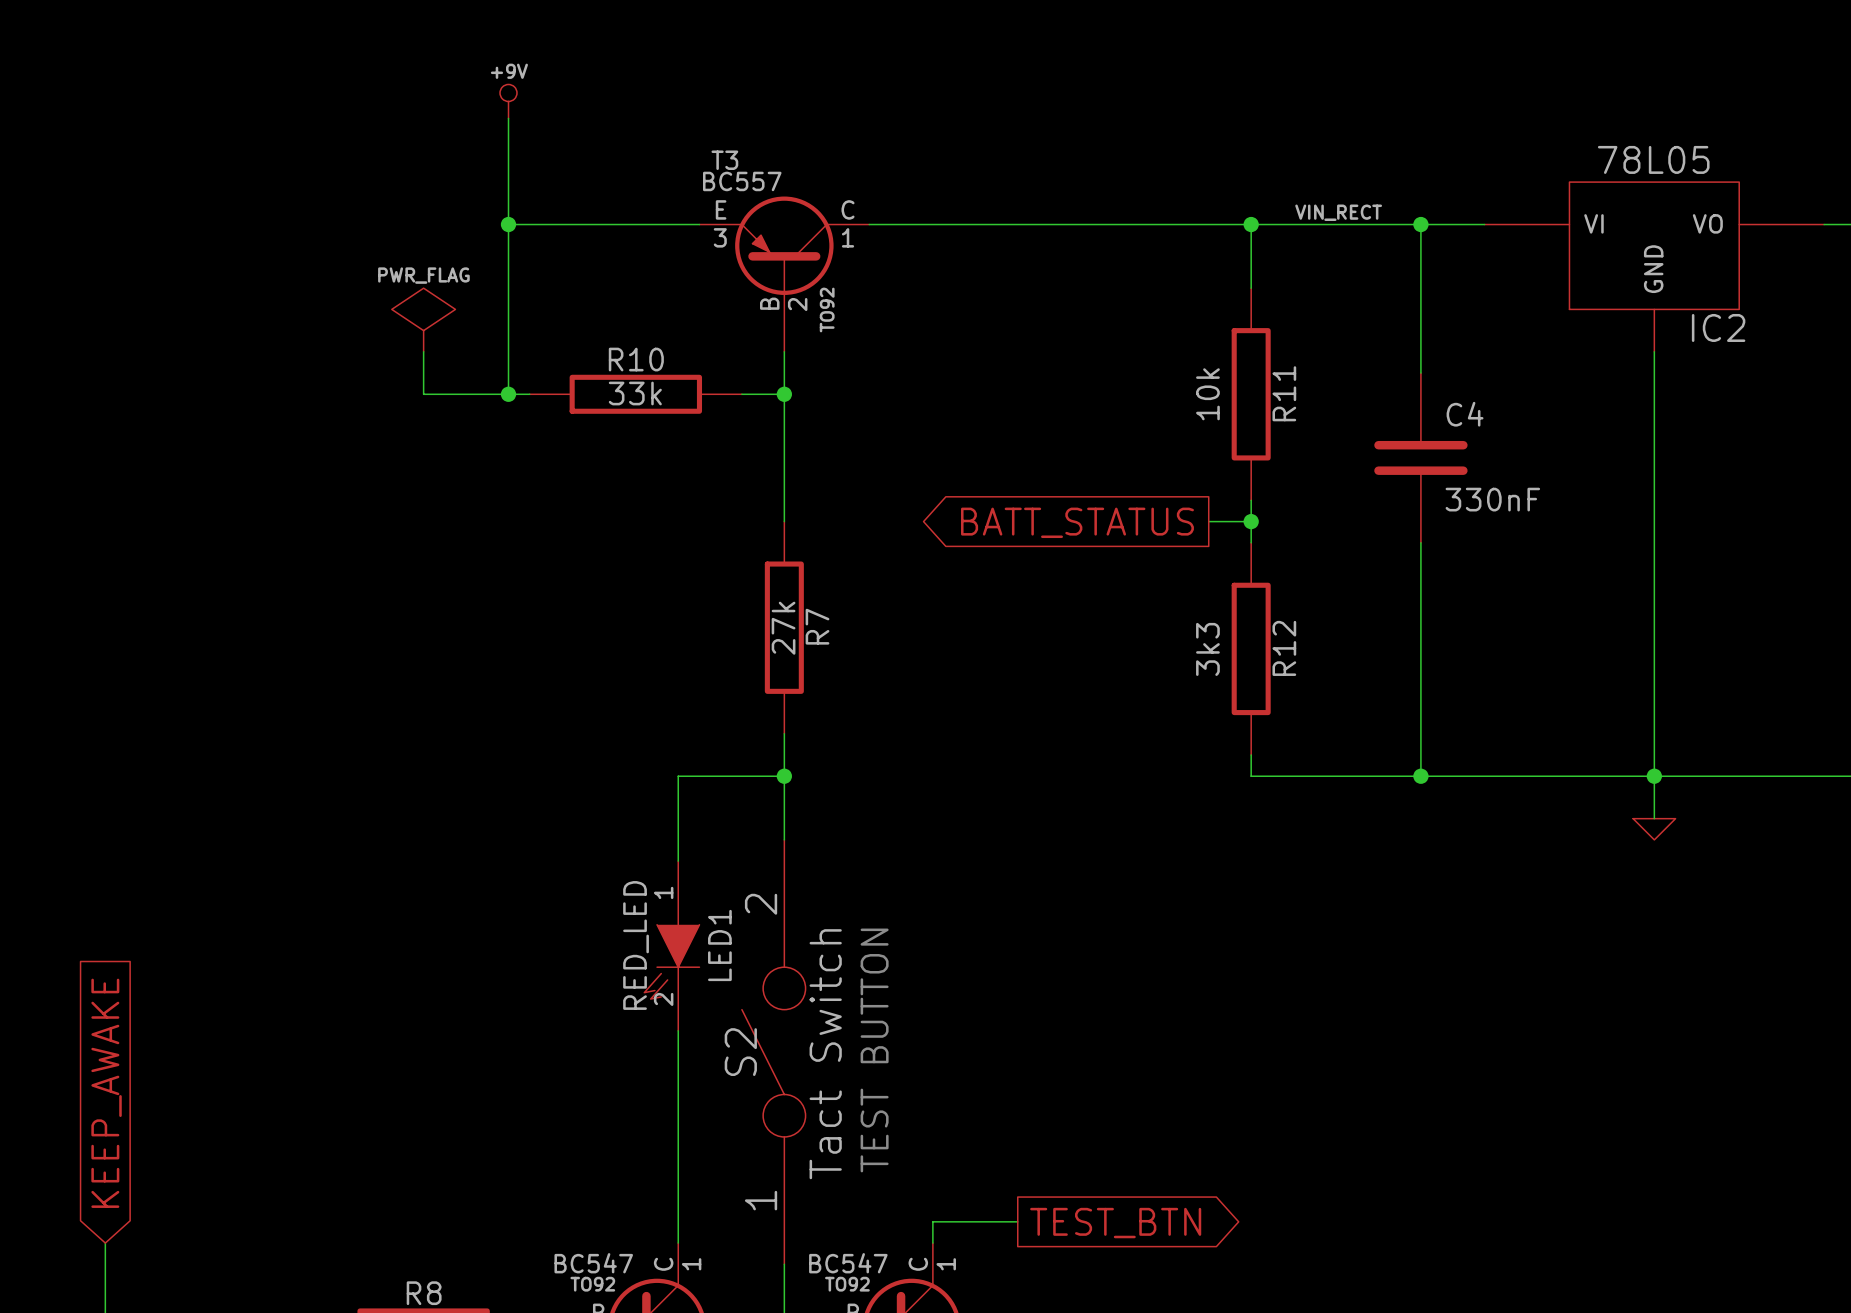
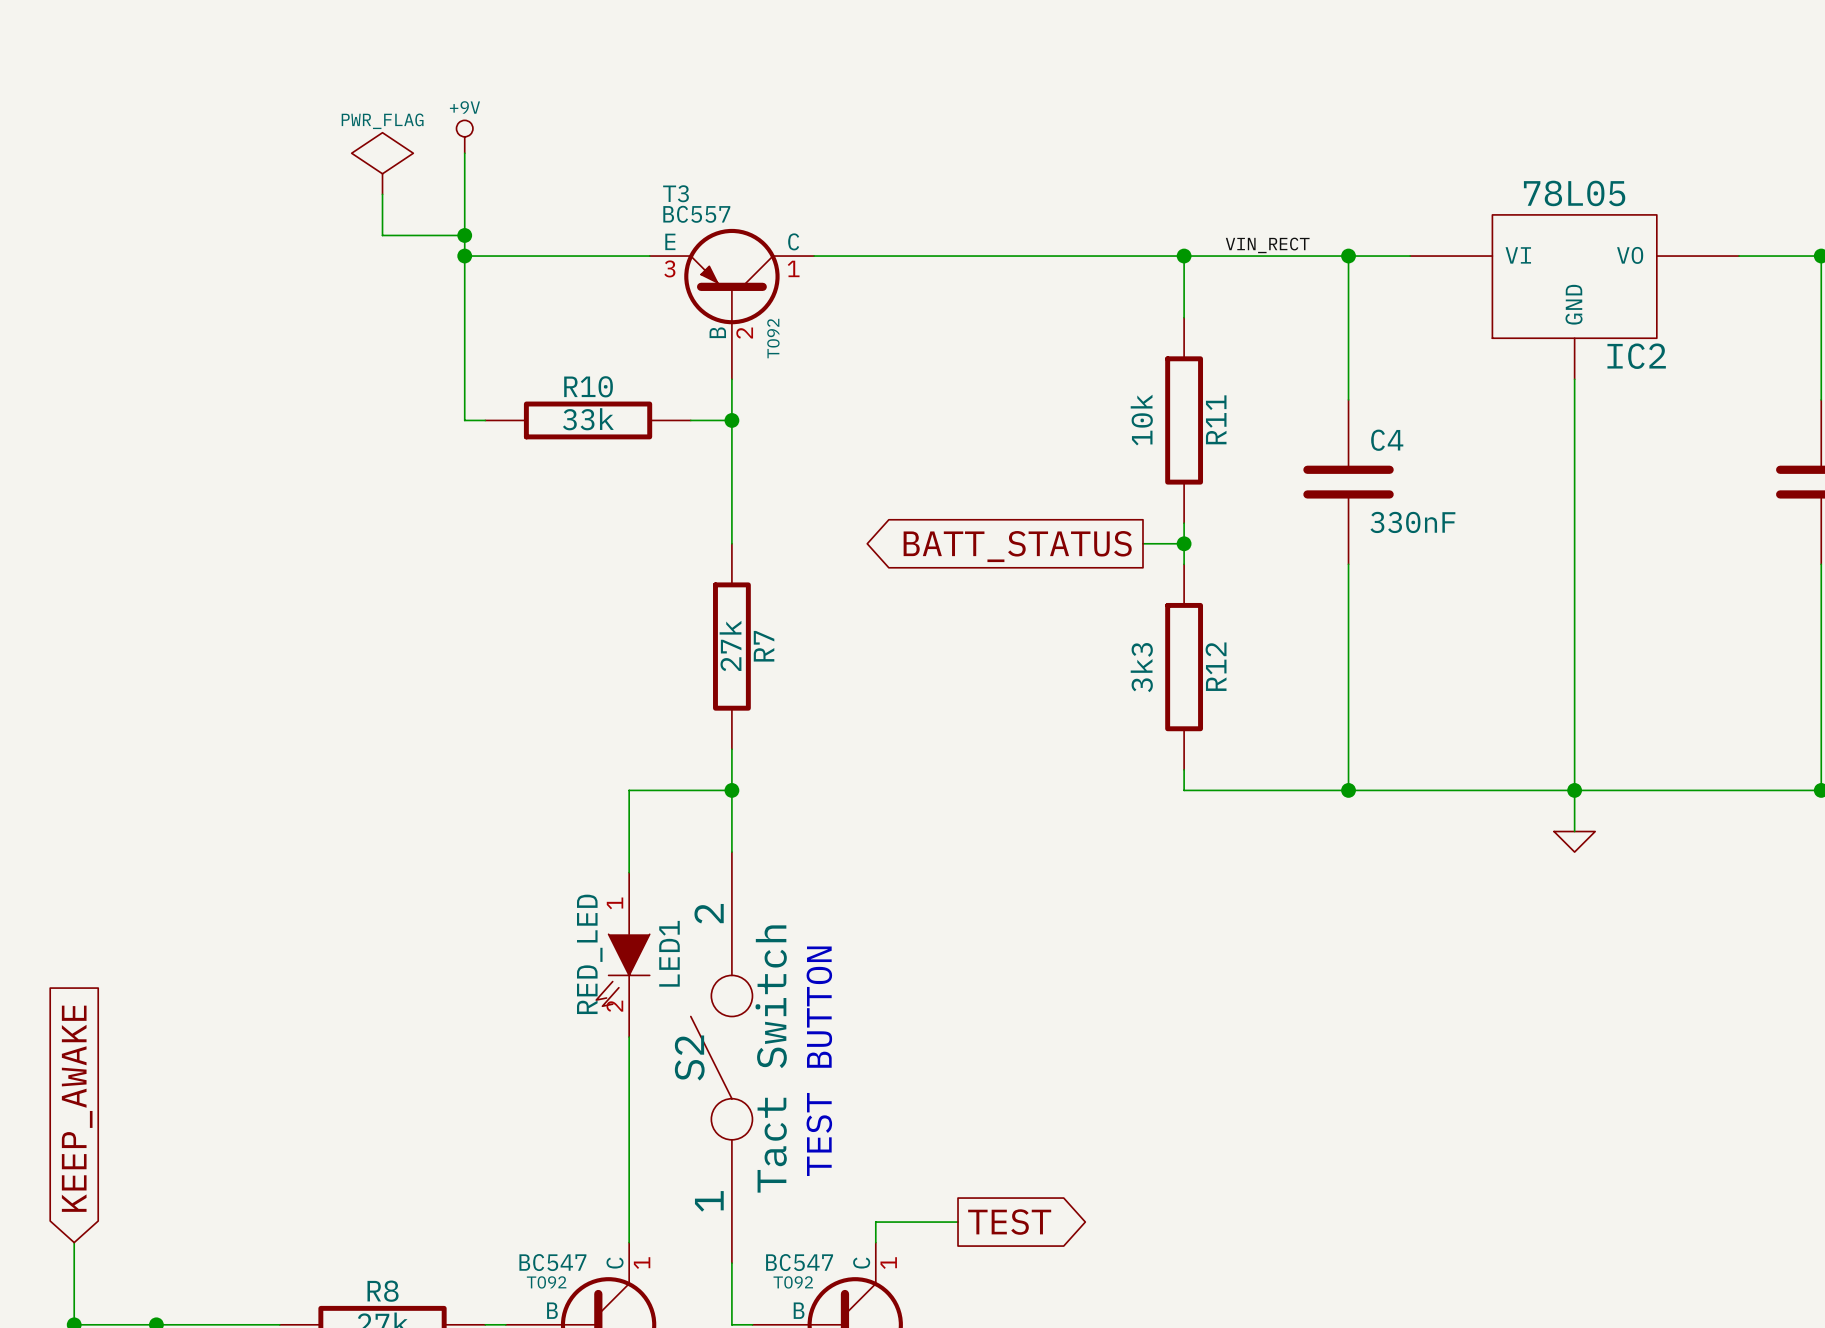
junction: none -> (464, 235)
power symbol position: PWR_FLAG (423, 320) -> PWR_FLAG (382, 163)
wire: (423, 351) (423, 394) (508, 394) -> (382, 194) (382, 235) (464, 235)
junction: (508, 394) -> none
global label: TEST_BTN (1115, 1223) -> TEST (1009, 1222)

